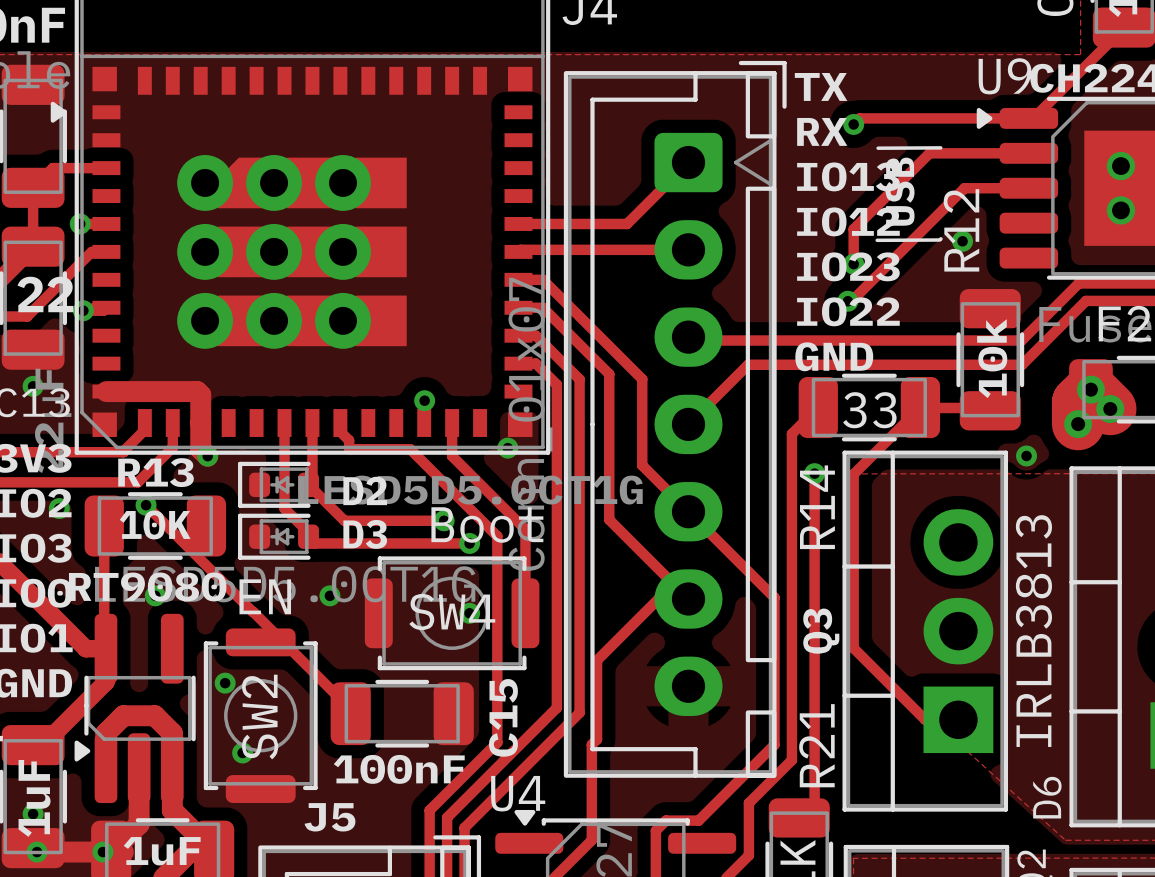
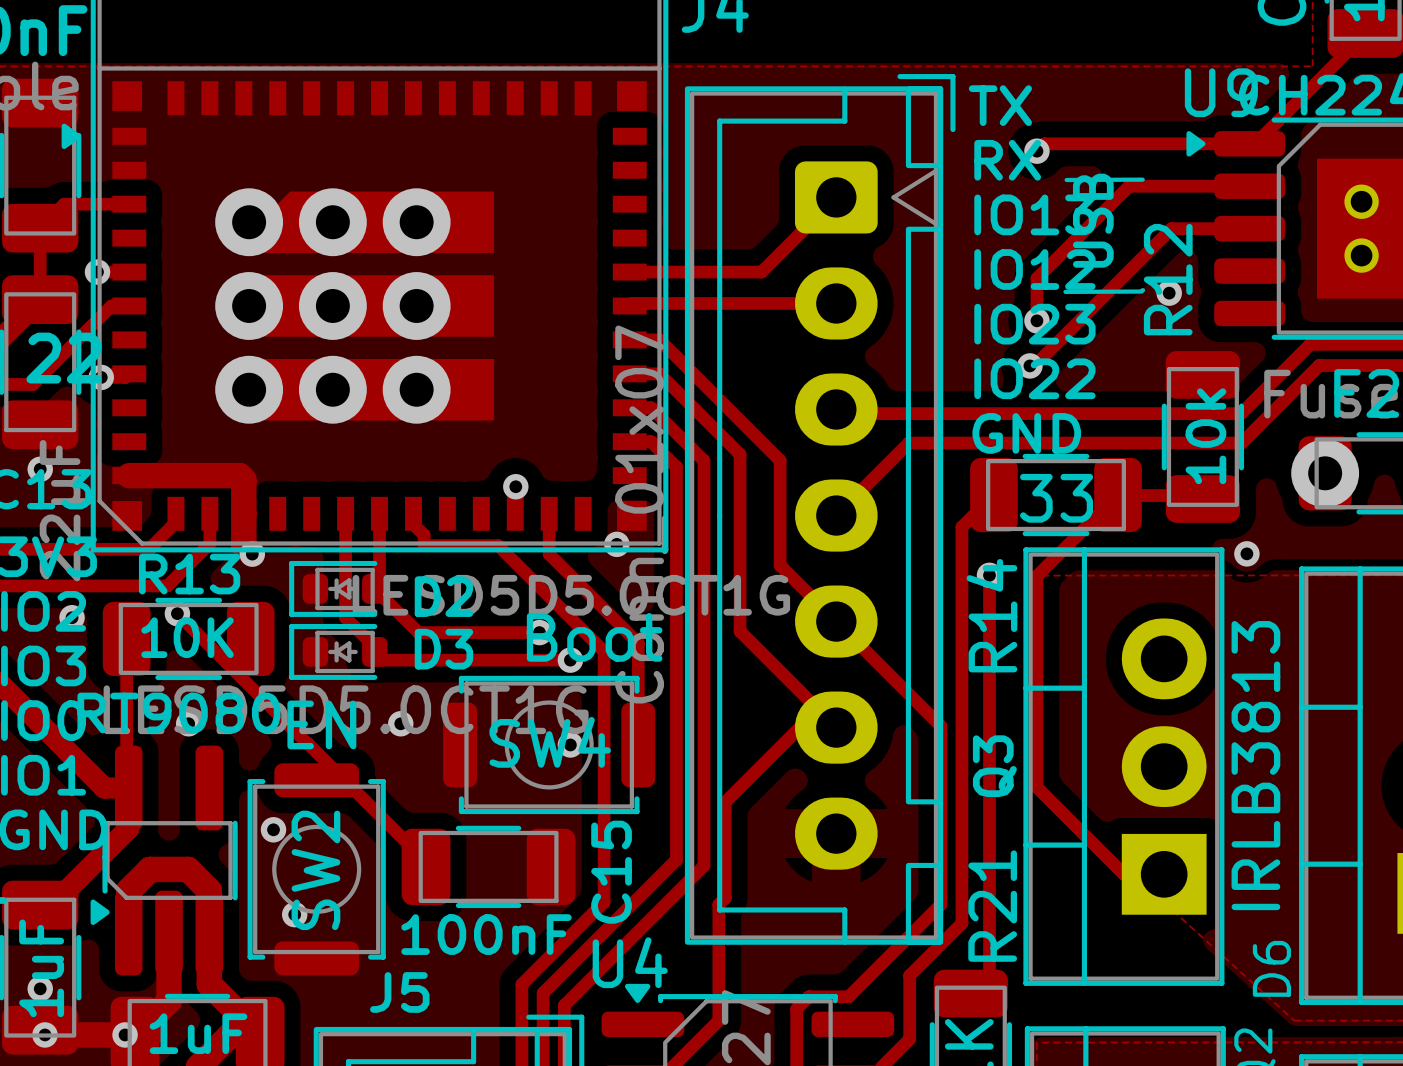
via size: [1076, 375, 1105, 404] -> [1291, 439, 1360, 508]
track: (1110, 409) (1090, 389) (1078, 402) (1078, 424) -> none
via: (1110, 409) -> none
via: (1078, 424) -> none

